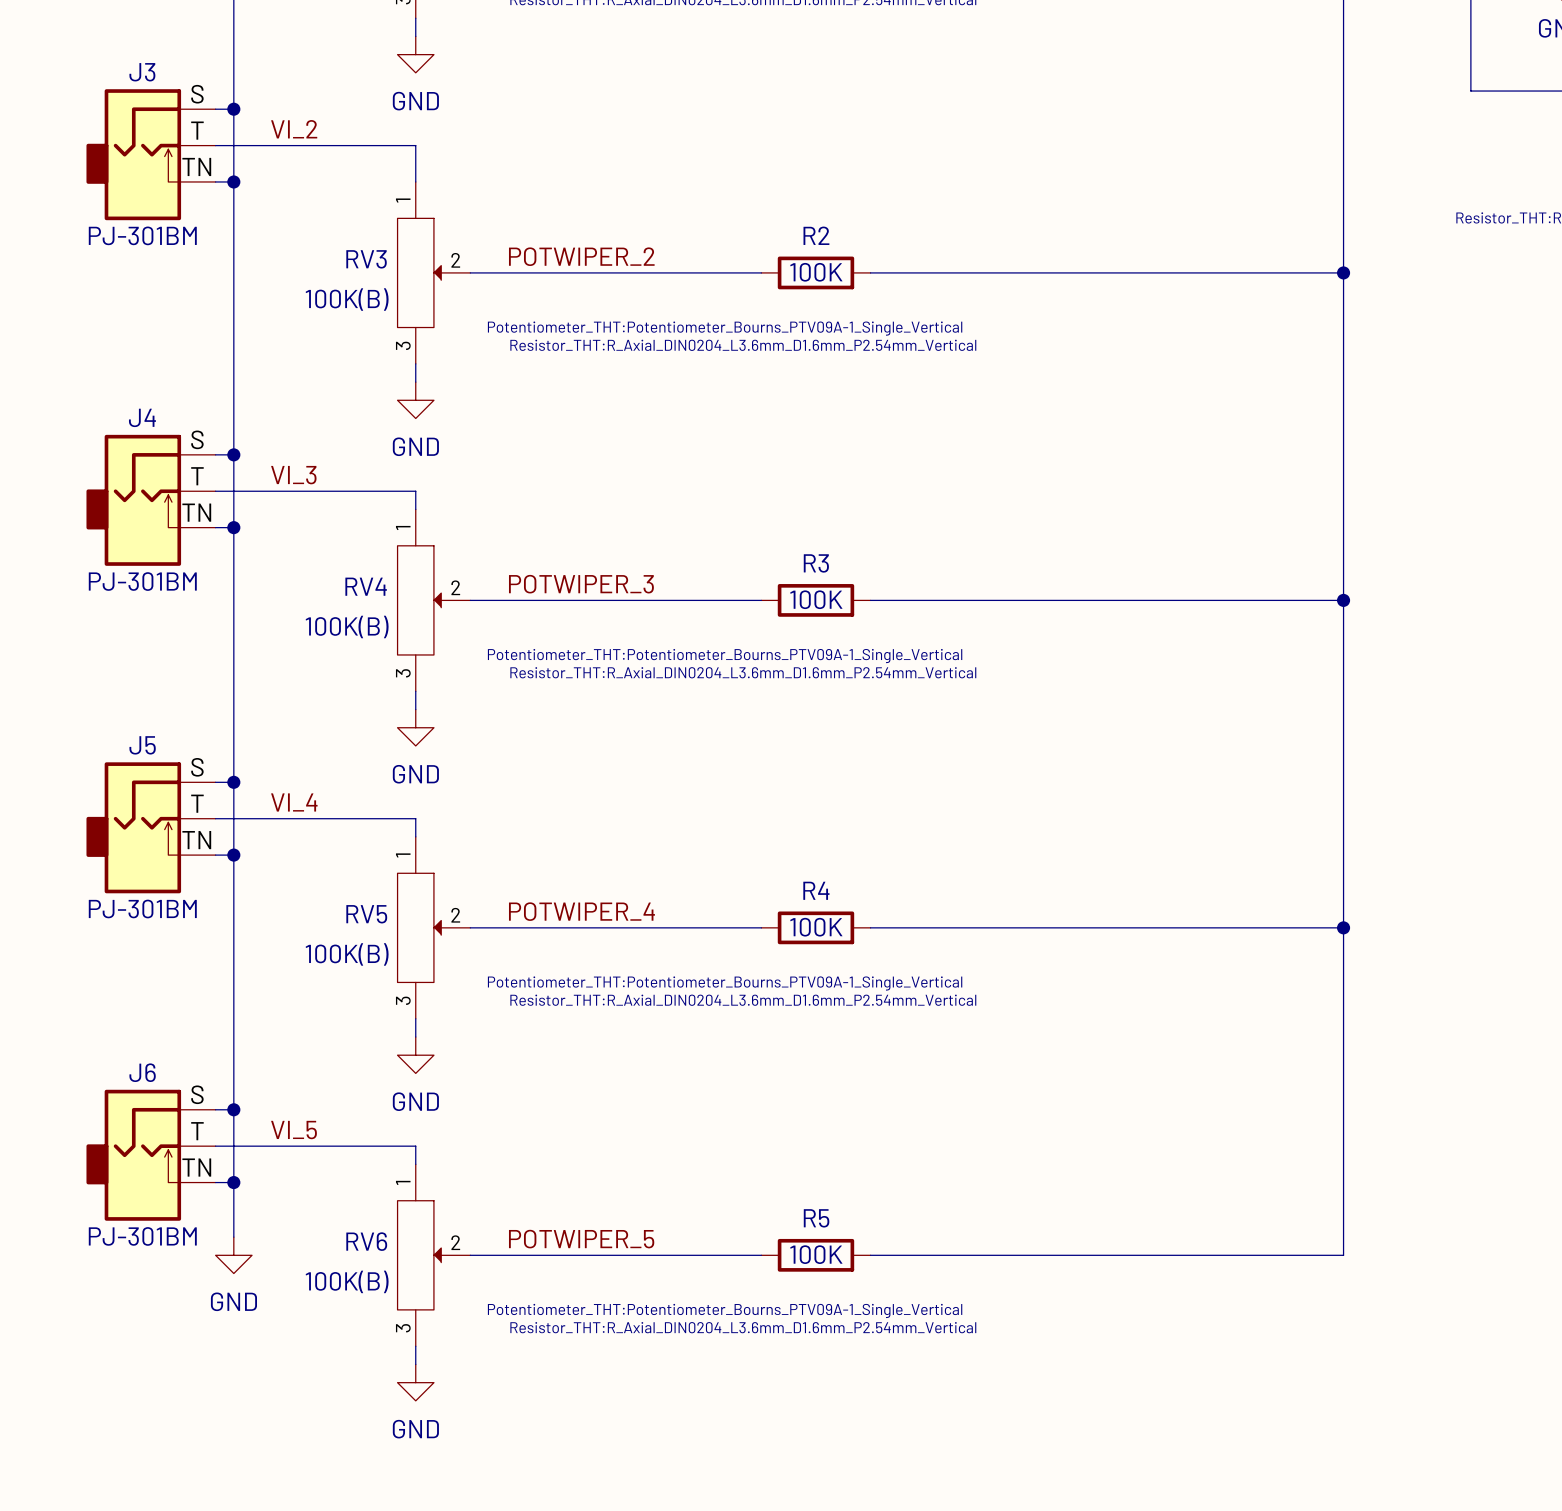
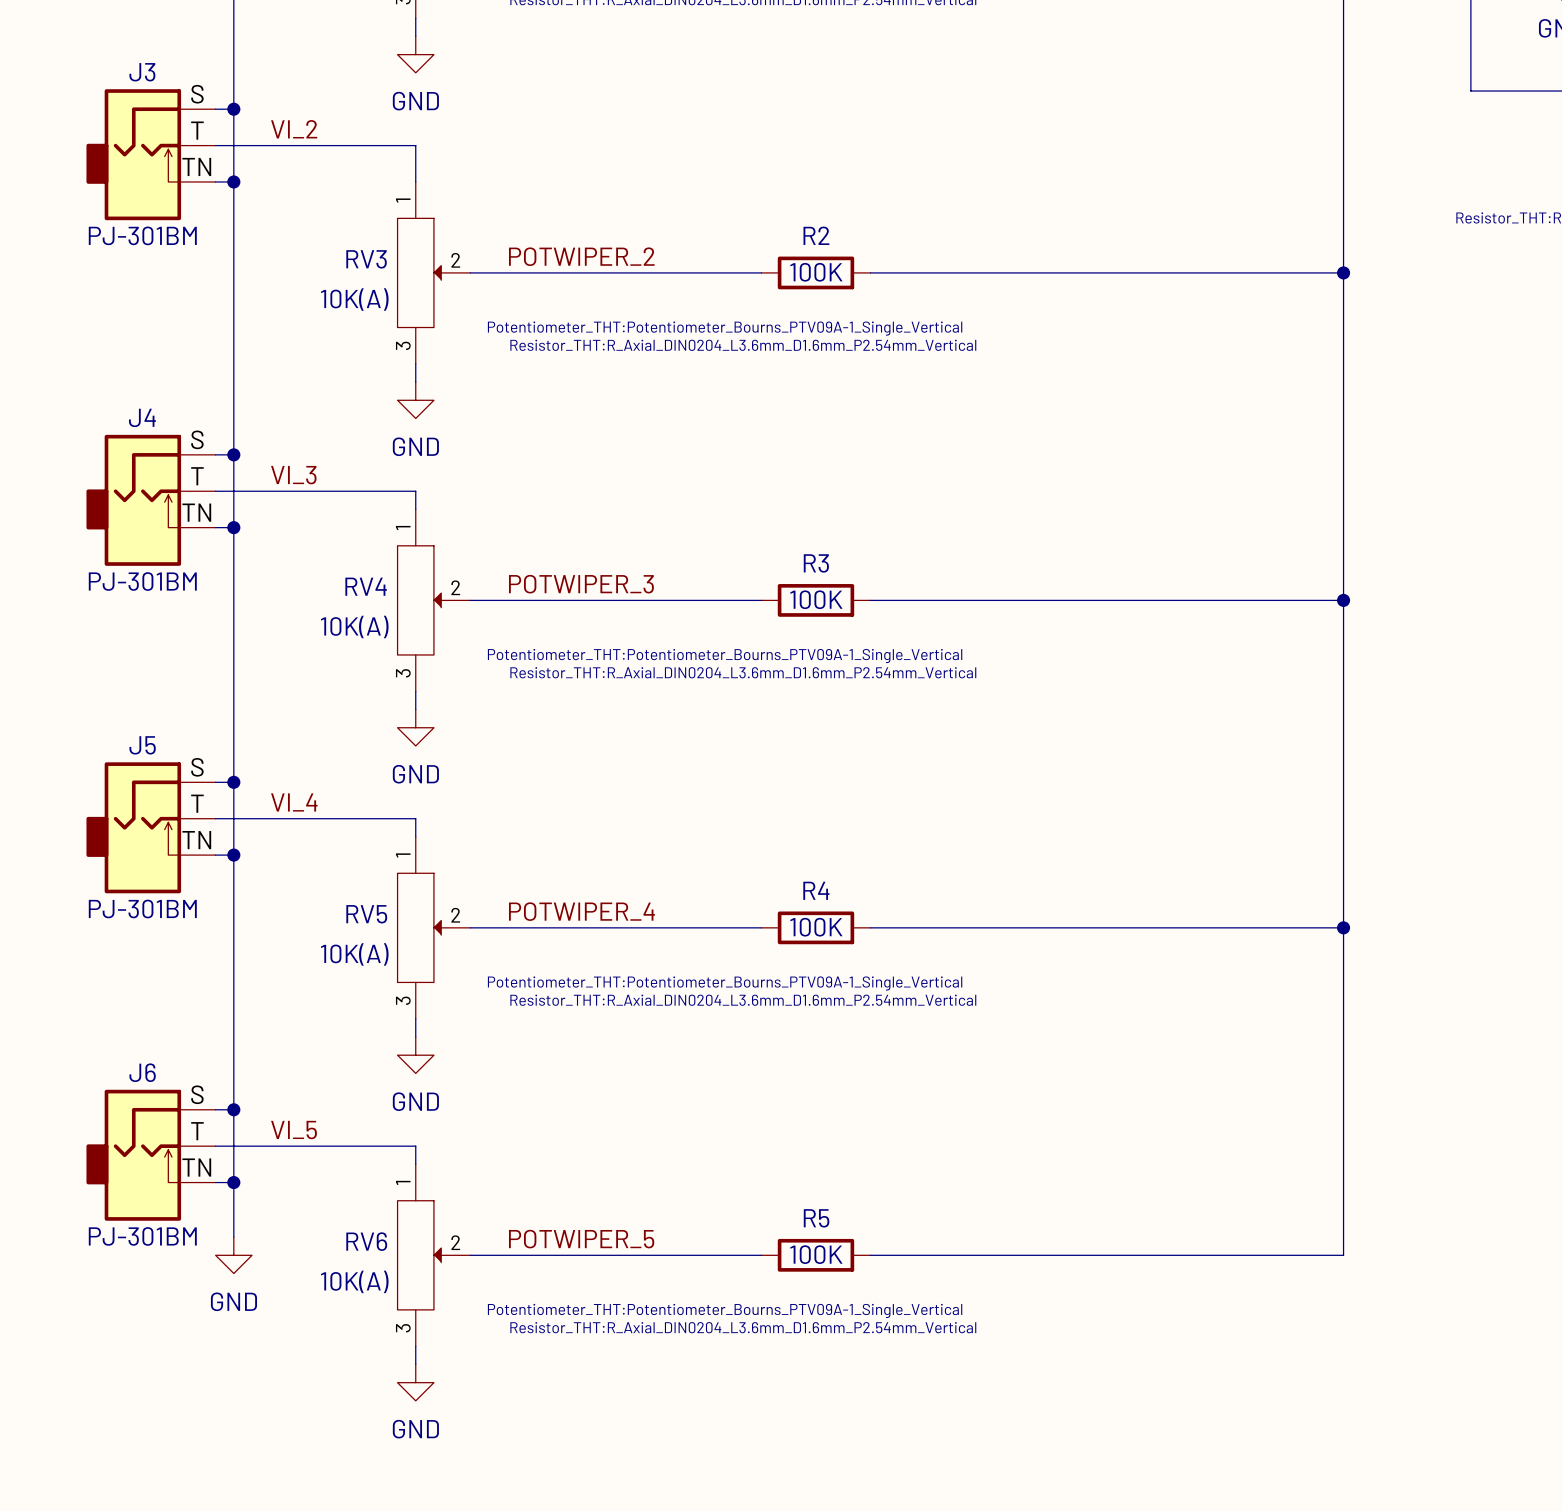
RV3 value: 100K(B) (347, 299) -> 10K(A) (354, 299)
RV4 value: 100K(B) (347, 626) -> 10K(A) (354, 626)
RV5 value: 100K(B) (347, 954) -> 10K(A) (354, 954)
RV6 value: 100K(B) (347, 1281) -> 10K(A) (354, 1281)

